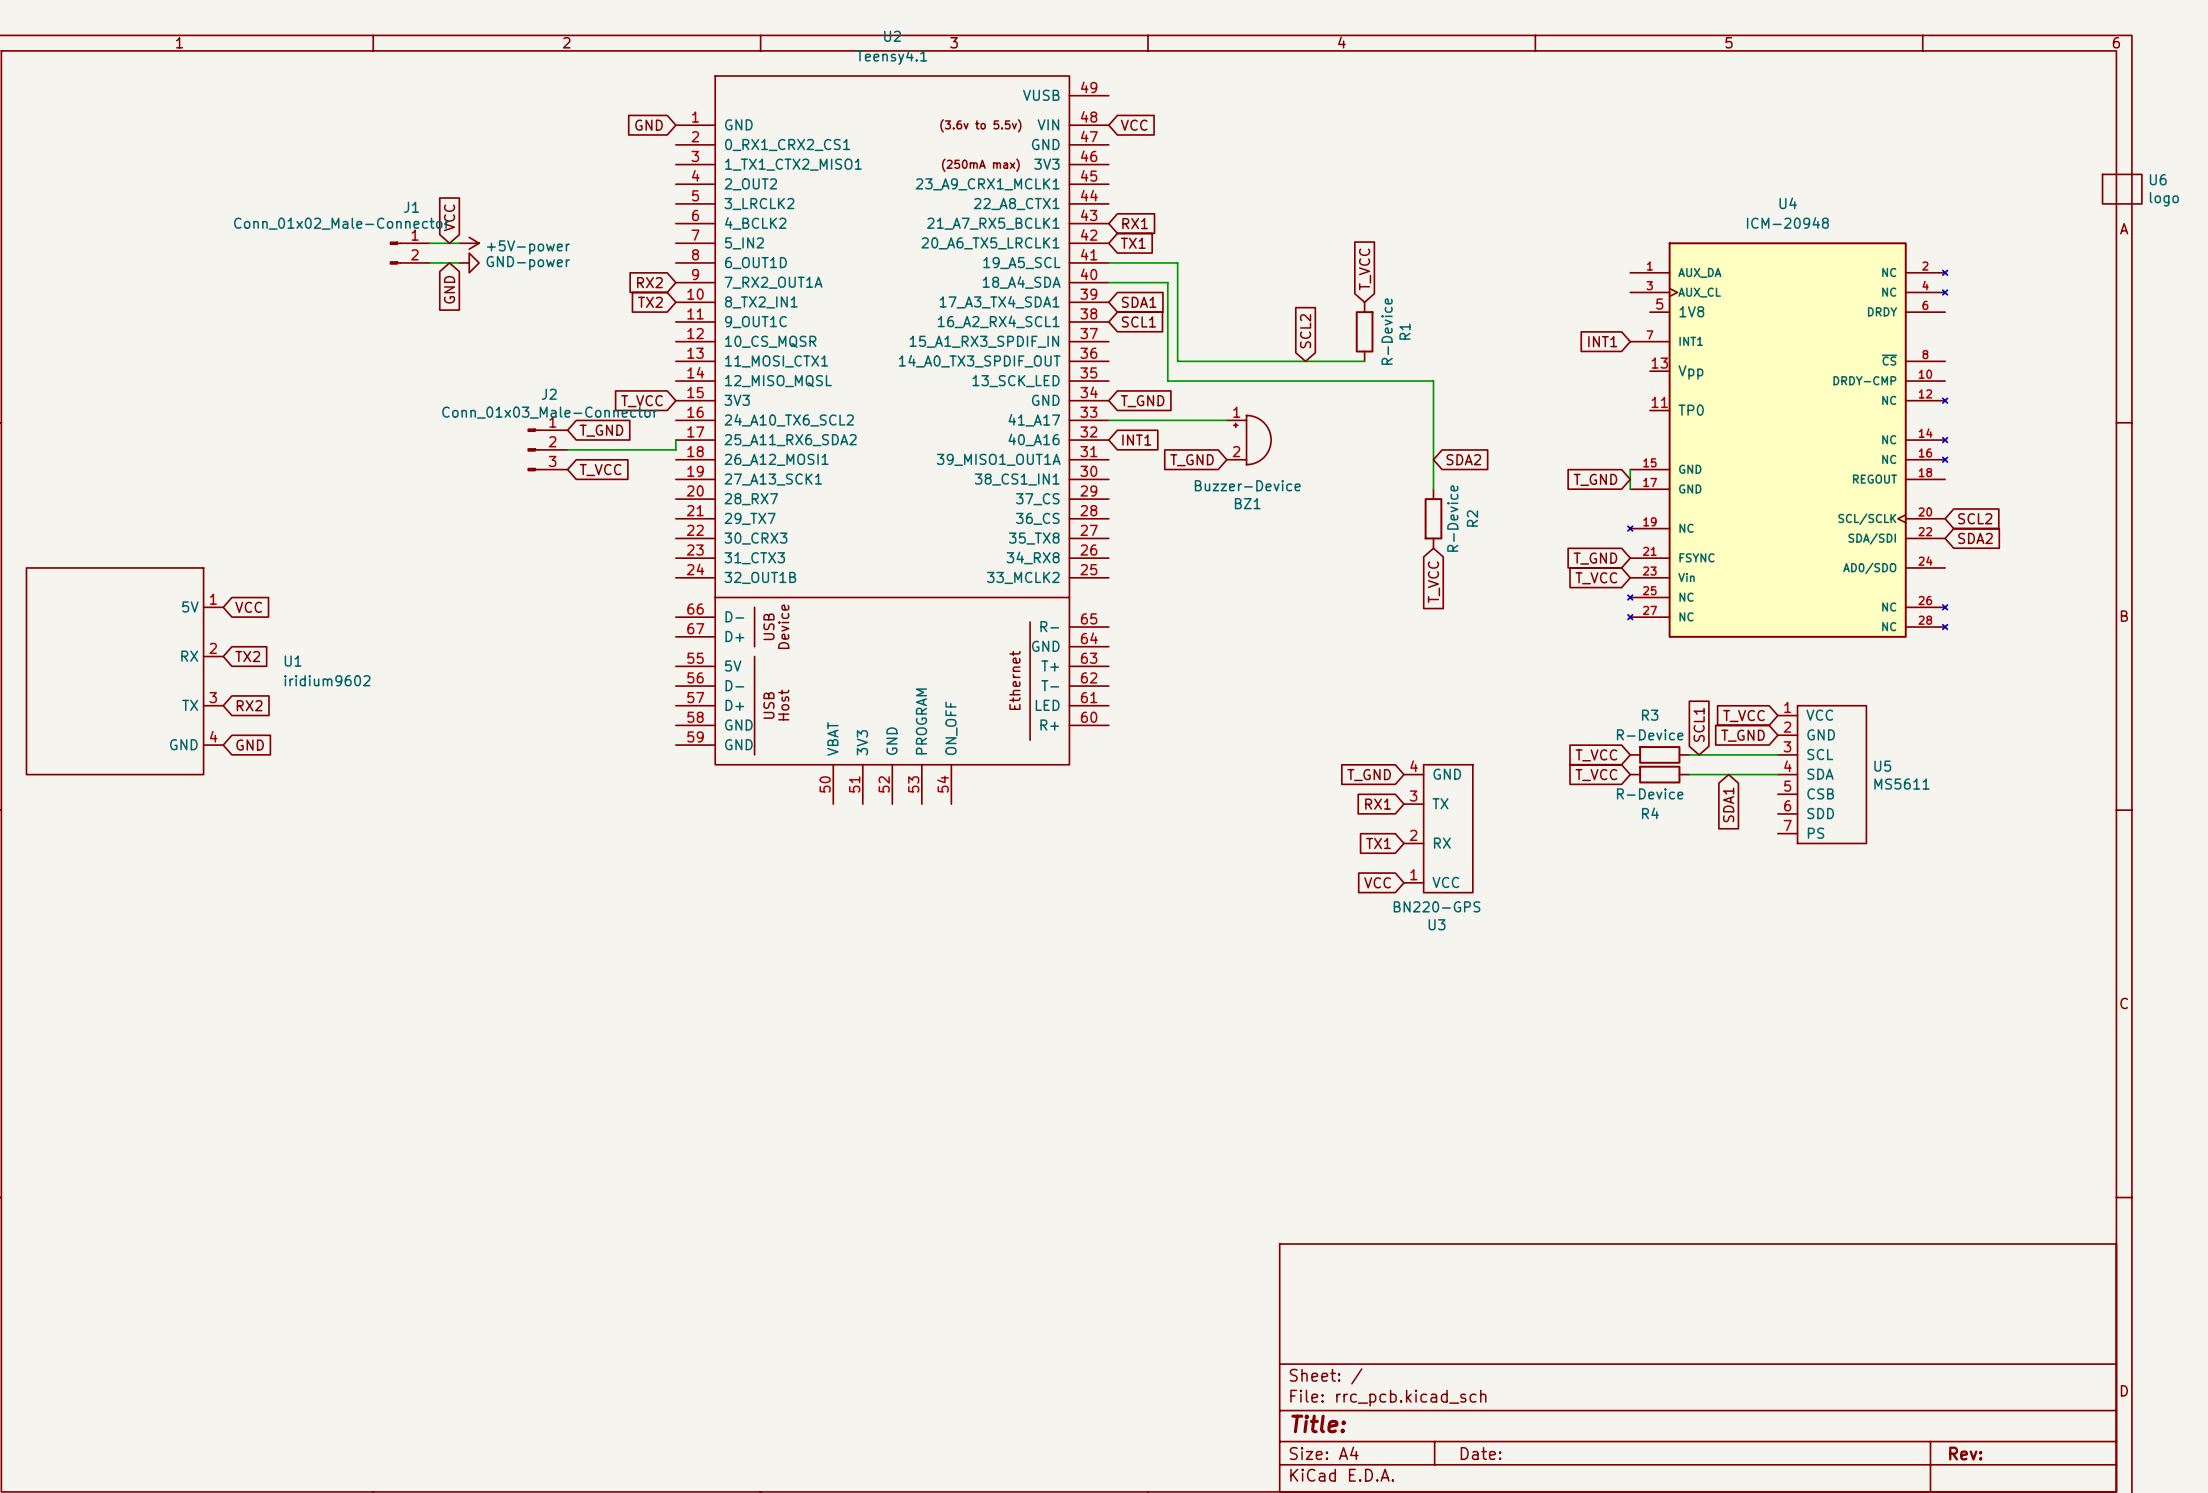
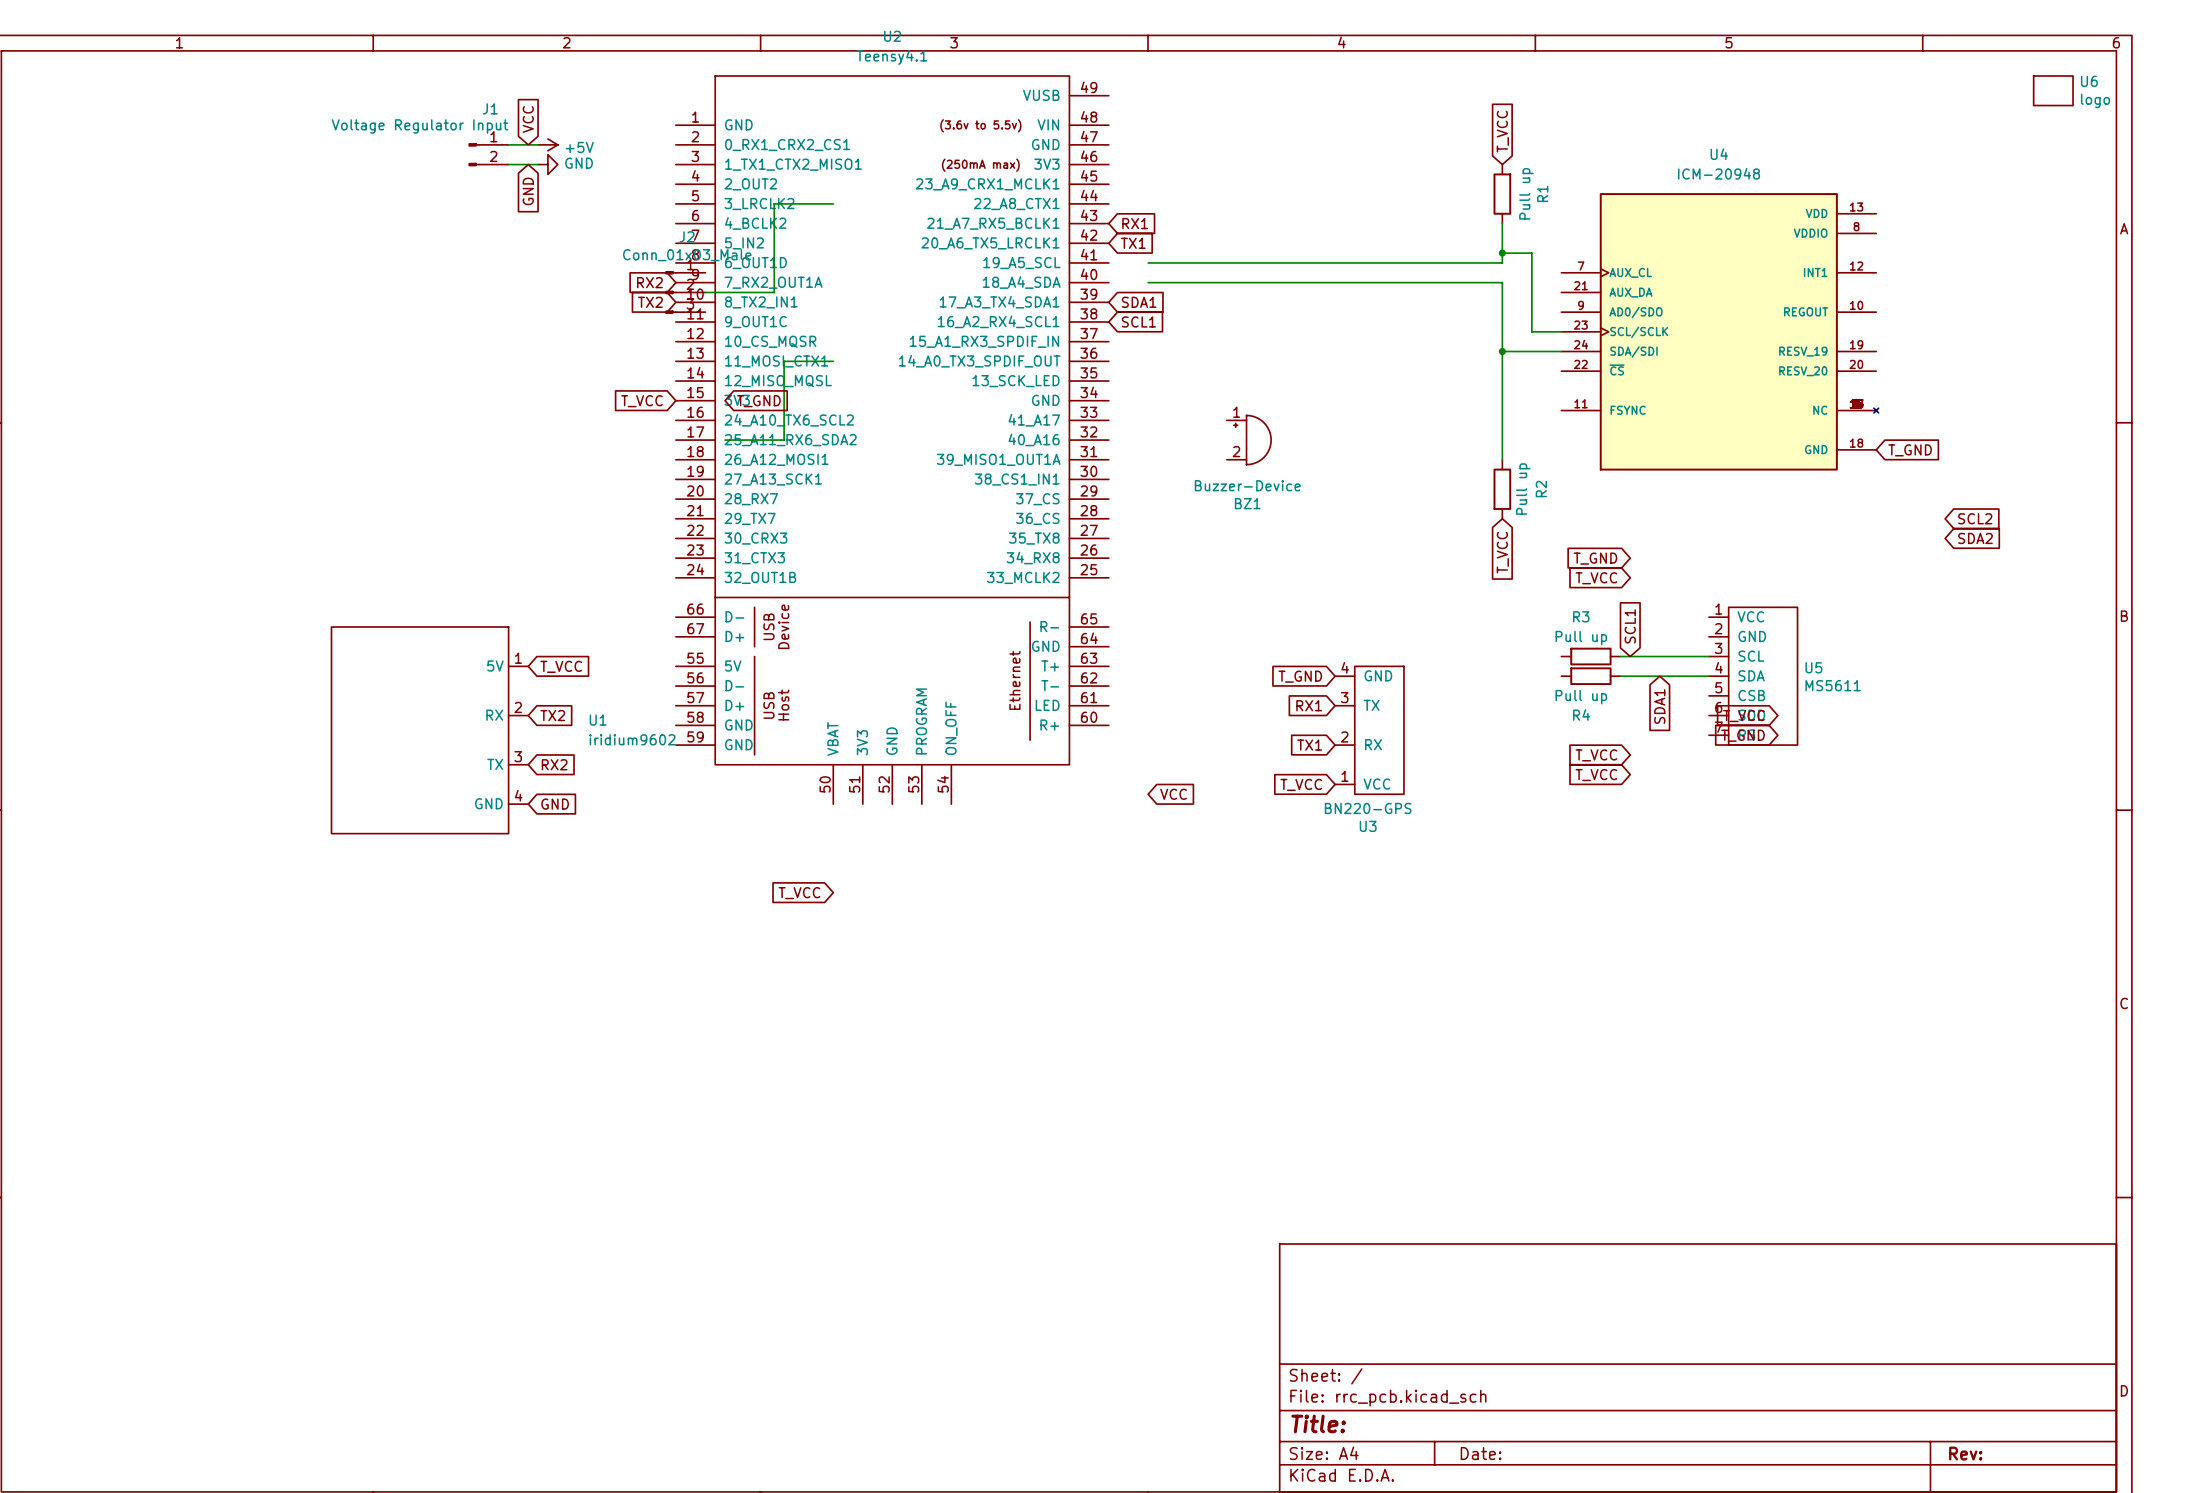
global label: GND (649, 125) -> none
global label: VCC (1134, 125) -> none
global label: none -> T_VCC (1502, 131)
power symbol: none -> +5V (547, 144)
power symbol: none -> GND (547, 164)
U6 position: (2122, 189) -> (2053, 90)
global label: none -> GND (528, 191)
wire: none -> (833, 203) (774, 203) (774, 292) (705, 292)
U4 name position: U4 (1788, 203) -> U4 (1719, 154)
global label position: VCC (449, 217) -> VCC (528, 119)
U4 value position: ICM-20948 (1787, 222) -> ICM-20948 (1719, 173)
J1 value: Conn_01x02_Male-Connector (341, 223) -> Voltage Regulator Input (420, 126)
U4 symbol: [1627, 242, 1948, 638] -> [1561, 193, 1879, 471]
wire: (429, 243) (459, 243) -> (508, 144) (538, 144)
power symbol: +5V-power (469, 243) -> none
J1 position: (409, 253) -> (488, 154)
wire: none -> (1502, 253) (1531, 253) (1531, 331) (1561, 331)
junction: none -> (1502, 253)
wire: (429, 262) (459, 262) -> (508, 164) (538, 164)
power symbol: GND-power (469, 262) -> none
wire: (1108, 262) (1148, 262) -> none
wire: (1177, 262) (1177, 361) (1364, 361) -> (1177, 262) (1502, 262) (1502, 223)
global label: T_VCC (1365, 269) -> none
wire: (1108, 282) (1148, 282) -> none
wire: (1167, 282) (1167, 381) (1433, 381) (1433, 489) -> (1167, 282) (1502, 282) (1502, 459)
global label: GND (449, 289) -> none
global label: SCL2 (1305, 331) -> none
R1 position: (1364, 331) -> (1502, 194)
R1 value: R-Device (1387, 331) -> Pull up (1526, 193)
global label: INT1 (1602, 341) -> none
wire: none -> (1502, 351) (1561, 351)
junction: none -> (1502, 351)
wire: none -> (833, 361) (784, 361) (784, 440) (725, 440)
global label: T_GND (1142, 401) -> none
J2 value: Conn_01x03_Male-Connector (549, 412) -> Conn_01x03_Male (687, 255)
wire: (1108, 420) (1226, 420) -> none
global label position: T_GND (601, 430) -> T_GND (758, 401)
wire: (675, 440) (675, 449) (567, 449) -> none
global label: INT1 (1136, 440) -> none
J2 position: (547, 449) -> (685, 292)
global label: none -> T_GND (1910, 450)
global label: SDA2 (1463, 459) -> none
global label: T_GND (1192, 460) -> none
wire: (1630, 469) (1630, 489) -> none
global label: T_VCC (600, 470) -> none
global label: T_GND (1595, 479) -> none
R2 position: (1433, 518) -> (1502, 489)
R2 value: R-Device (1452, 518) -> Pull up (1523, 489)
global label position: T_VCC (1433, 582) -> T_VCC (1502, 552)
global label: VCC (248, 607) -> none
global label: TX2 (247, 656) -> none
global label: none -> T_VCC (561, 666)
U1 position: (149, 671) -> (454, 730)
global label: RX2 (249, 705) -> none
global label: none -> TX2 (552, 715)
global label position: SCL1 (1699, 724) -> SCL1 (1630, 626)
R3 value: R-Device (1650, 734) -> Pull up (1581, 638)
global label: GND (250, 745) -> none
R3 position: (1659, 754) -> (1590, 656)
wire: (1689, 754) (1777, 754) -> (1620, 656) (1708, 656)
global label: none -> RX2 (554, 764)
R4 position: (1659, 774) -> (1590, 676)
wire: (1689, 774) (1777, 774) -> (1620, 676) (1708, 676)
U5 position: (1822, 774) -> (1753, 676)
global label position: T_GND (1369, 775) -> T_GND (1300, 676)
global label: none -> T_VCC (1301, 784)
R4 value: R-Device (1650, 793) -> Pull up (1581, 697)
global label: none -> VCC (1173, 794)
global label: none -> GND (555, 804)
global label position: RX1 (1378, 804) -> RX1 (1309, 705)
global label position: SDA1 (1728, 804) -> SDA1 (1659, 706)
U3 position: (1438, 828) -> (1369, 730)
global label position: TX1 (1378, 843) -> TX1 (1309, 745)
global label: VCC (1377, 882) -> none
global label: none -> T_VCC (799, 893)

